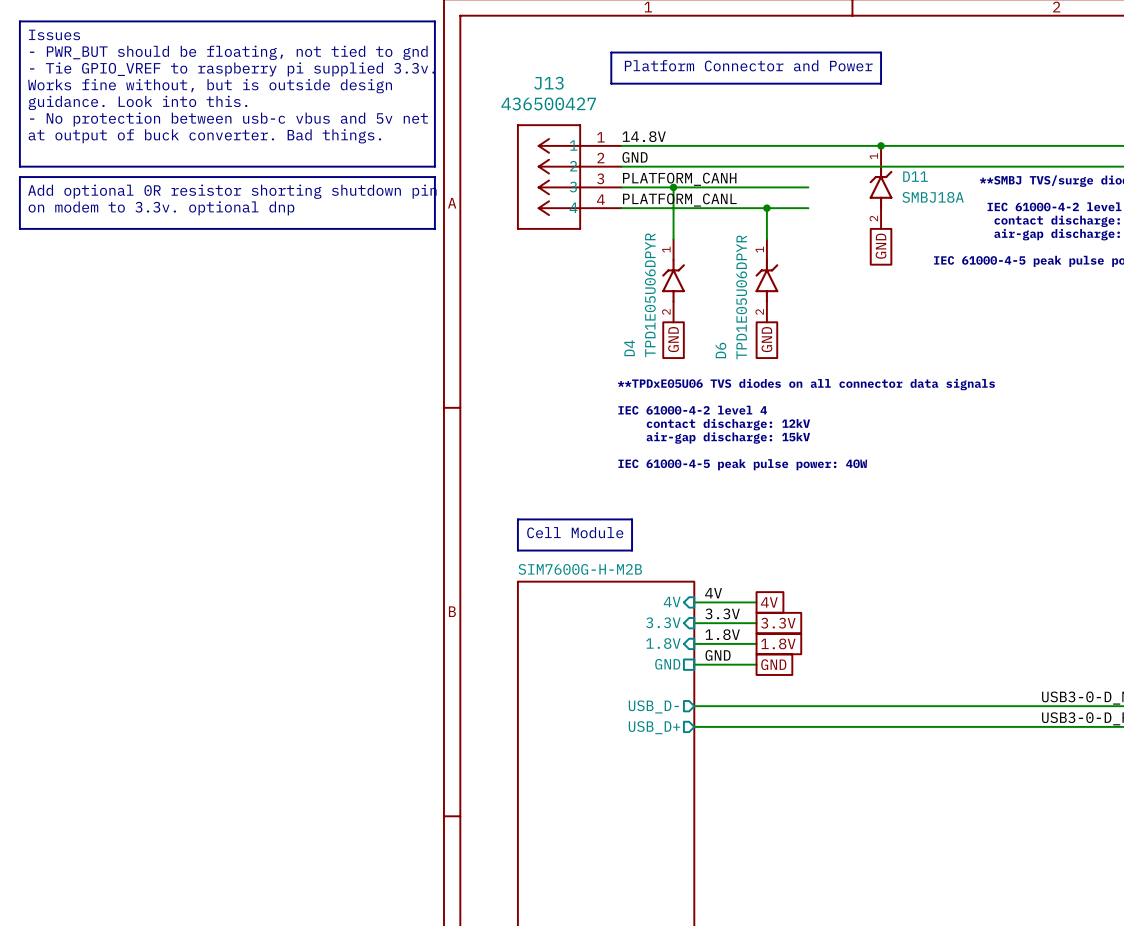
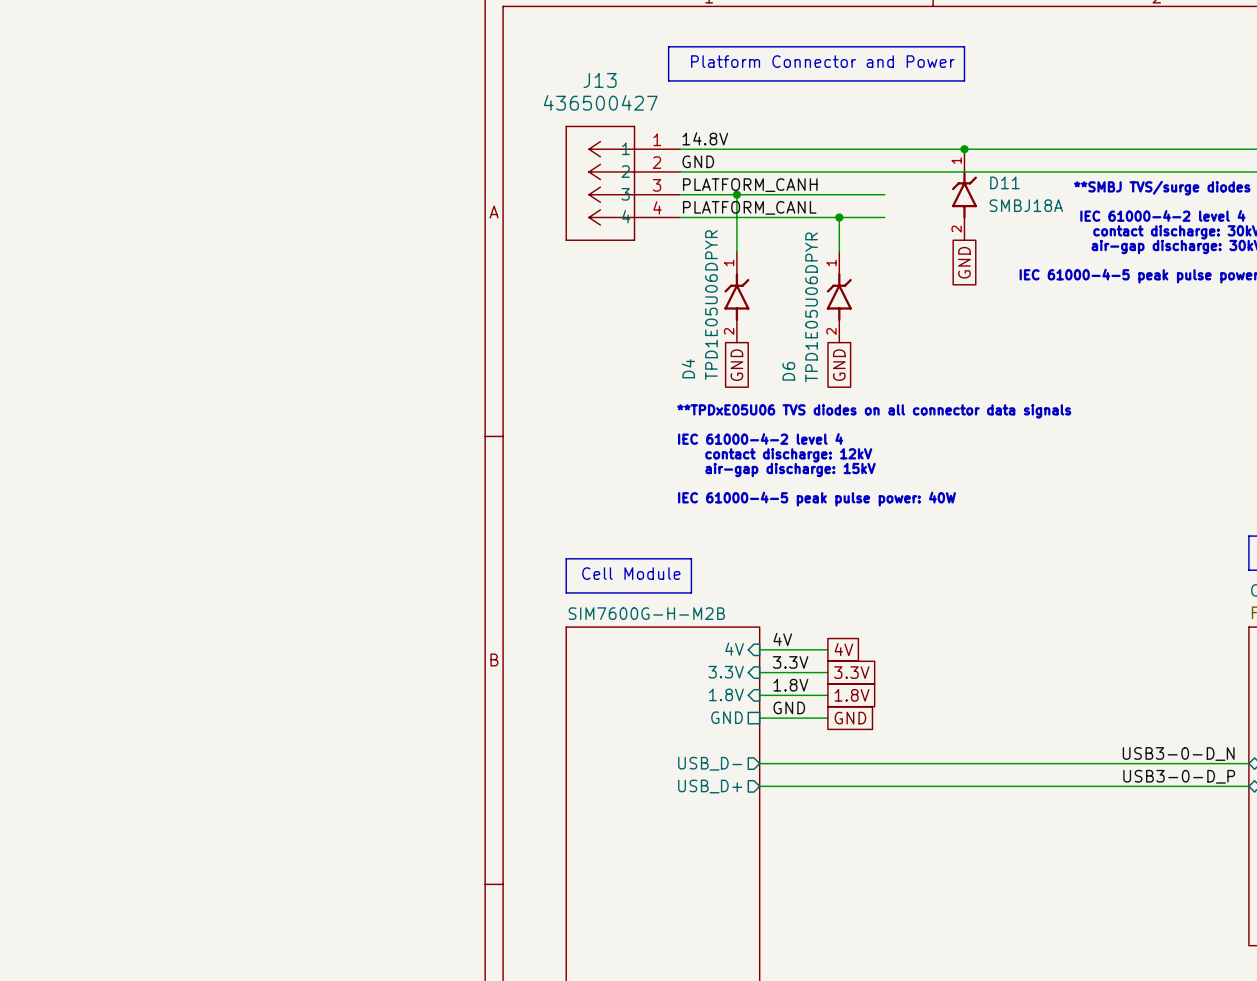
line: (19, 21) (434, 21) (434, 166) (19, 166) (19, 21) -> none
text: Issues (54, 34) -> none
text: - PWR_BUT should be floating, not tied to gnd (228, 52) -> none
text: - Tie GPIO_VREF to raspberry pi supplied 3.3v. (232, 69) -> none
text: Works fine without, but is outside design (210, 86) -> none
text: guidance. Look into this. (137, 102) -> none
text: - No protection between usb-c vbus and 5v net (228, 119) -> none
text: at output of buck converter. Bad things. (204, 136) -> none
line: (19, 177) (19, 228) (434, 228) (434, 177) (19, 177) -> none
text: Add optional 0R resistor shorting shutdown pin (232, 191) -> none
text: on modem to 3.3v. optional dnp (161, 208) -> none

